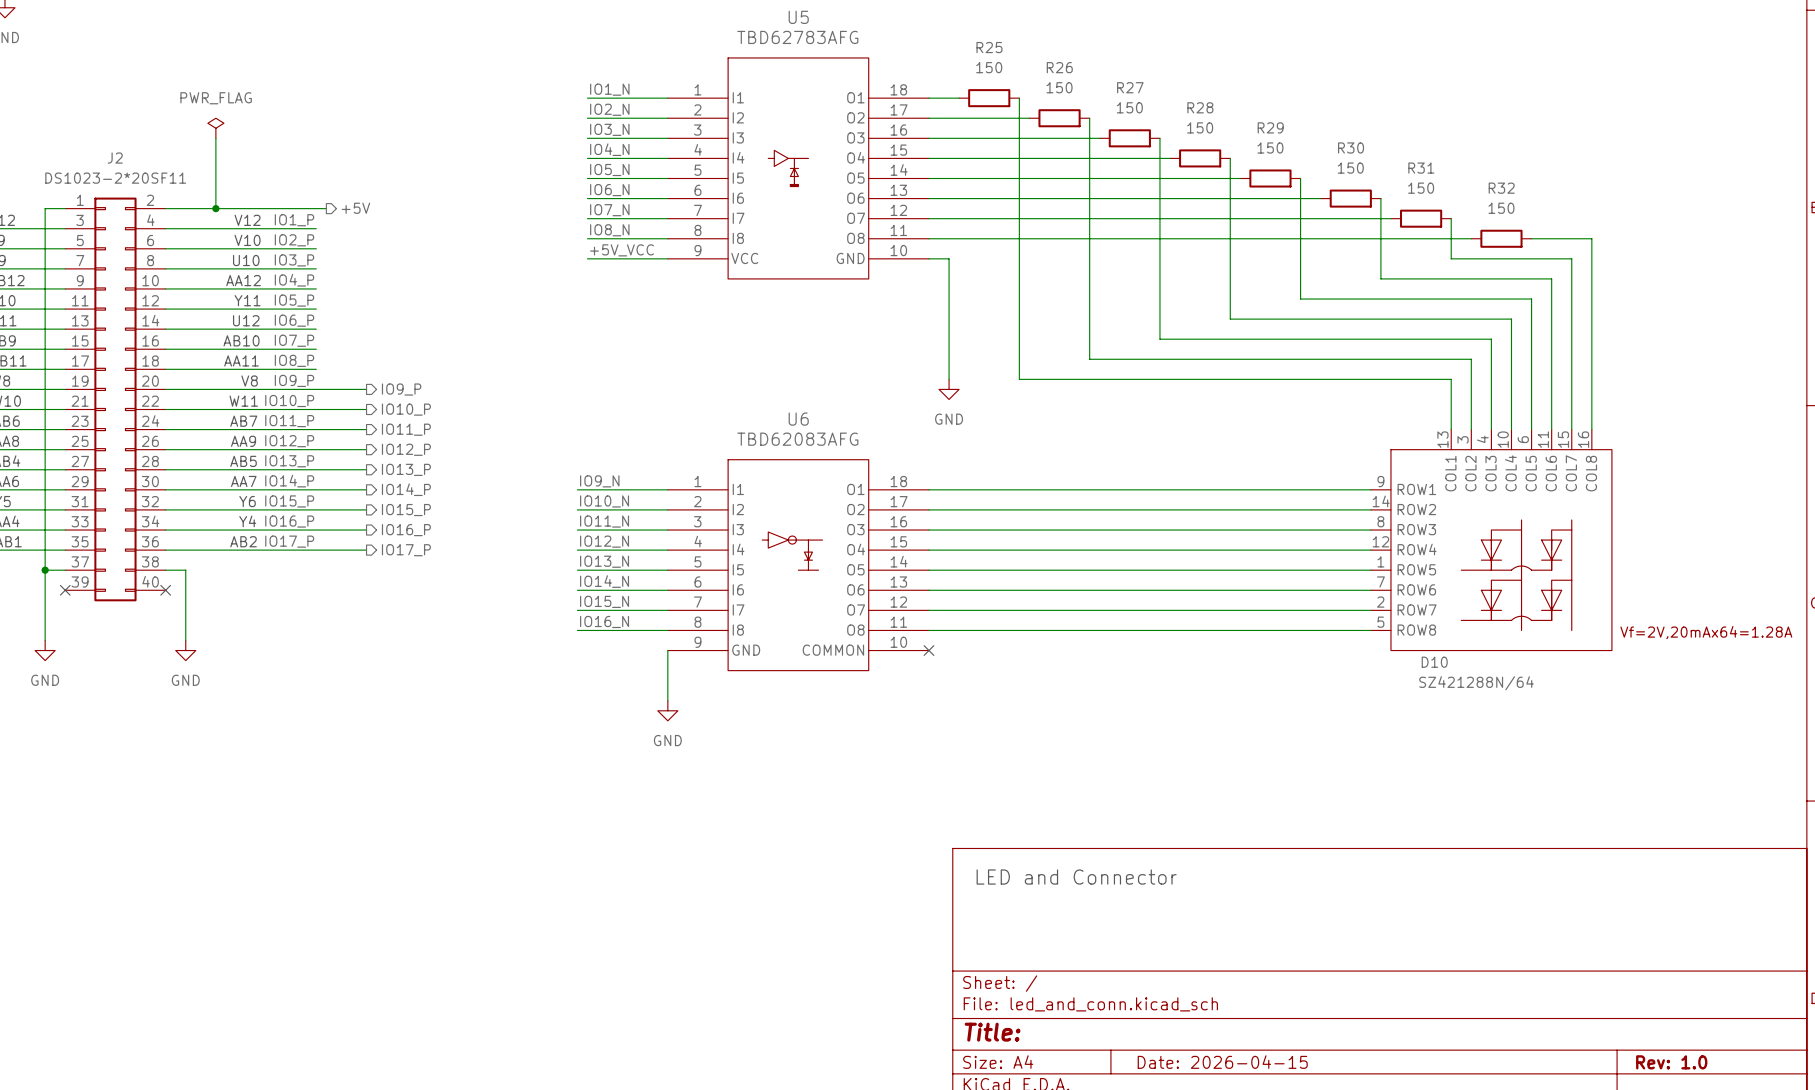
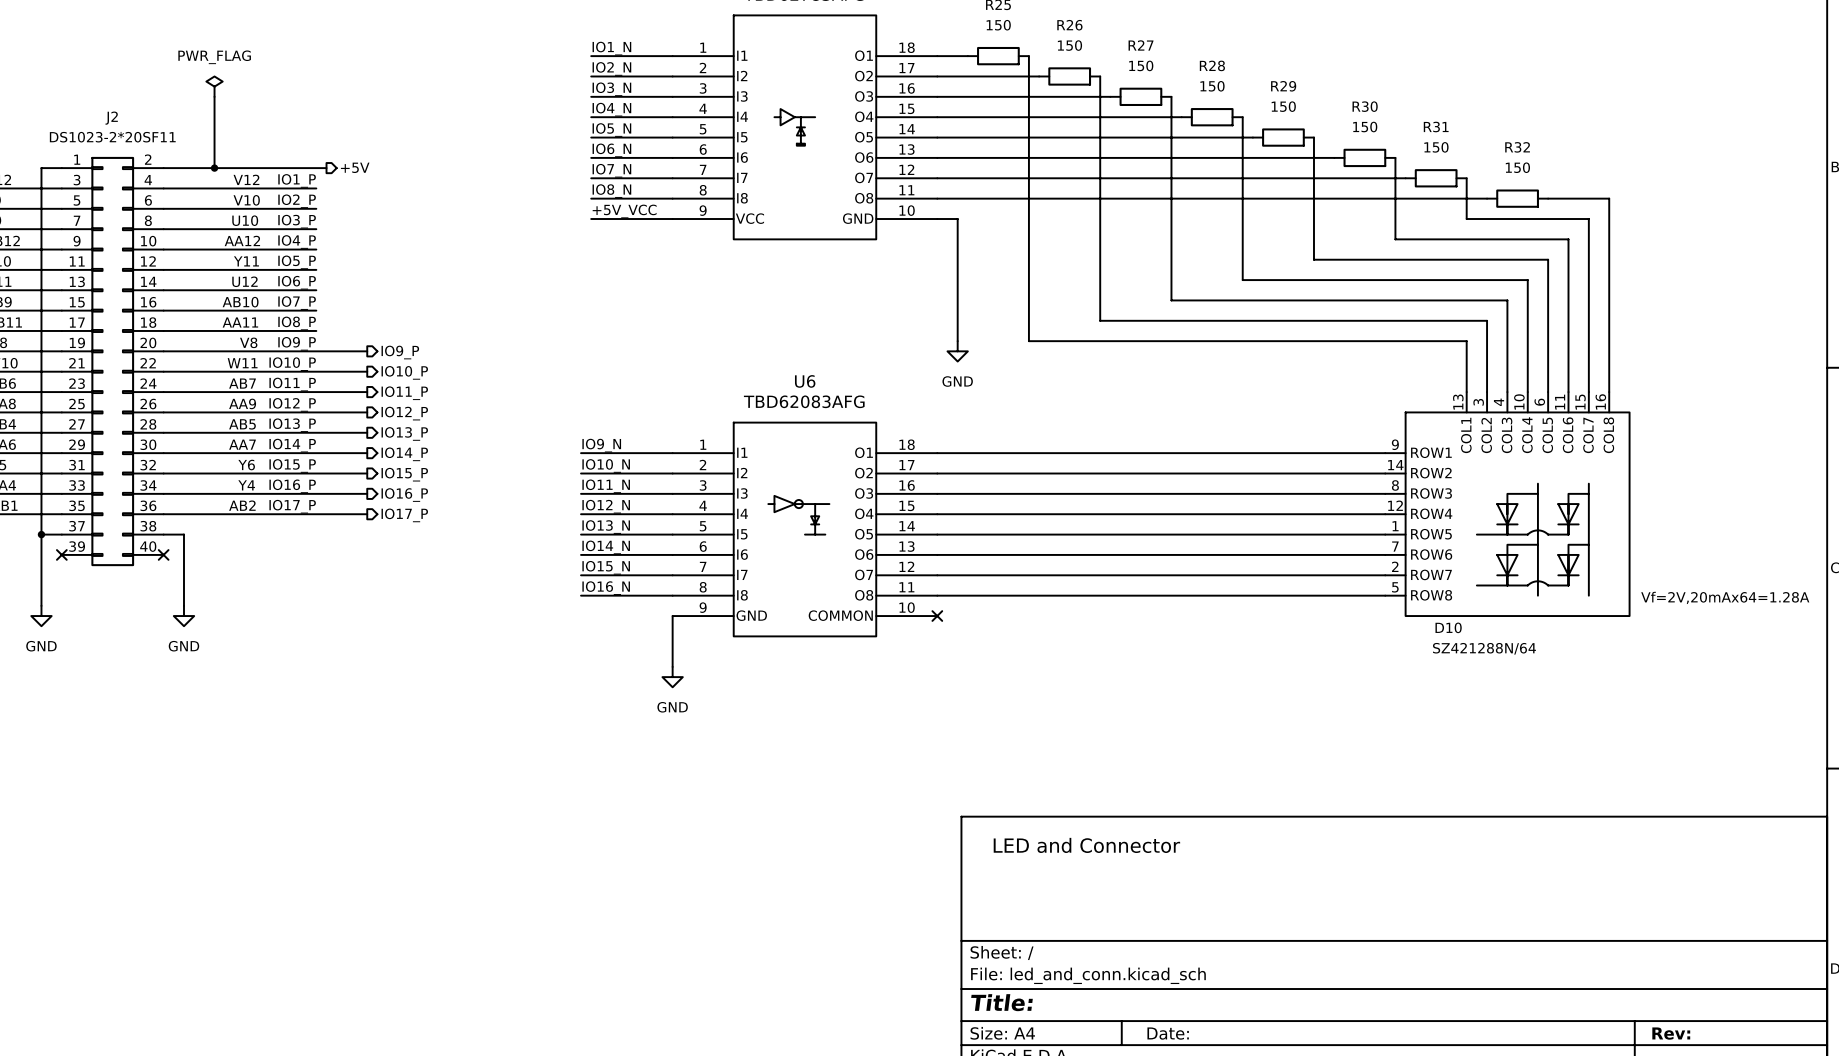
title block: Date: 2026-04-15 (1222, 1062) -> Date: (1168, 1033)
title block: Rev: 1.0 (1671, 1062) -> Rev: (1671, 1033)

